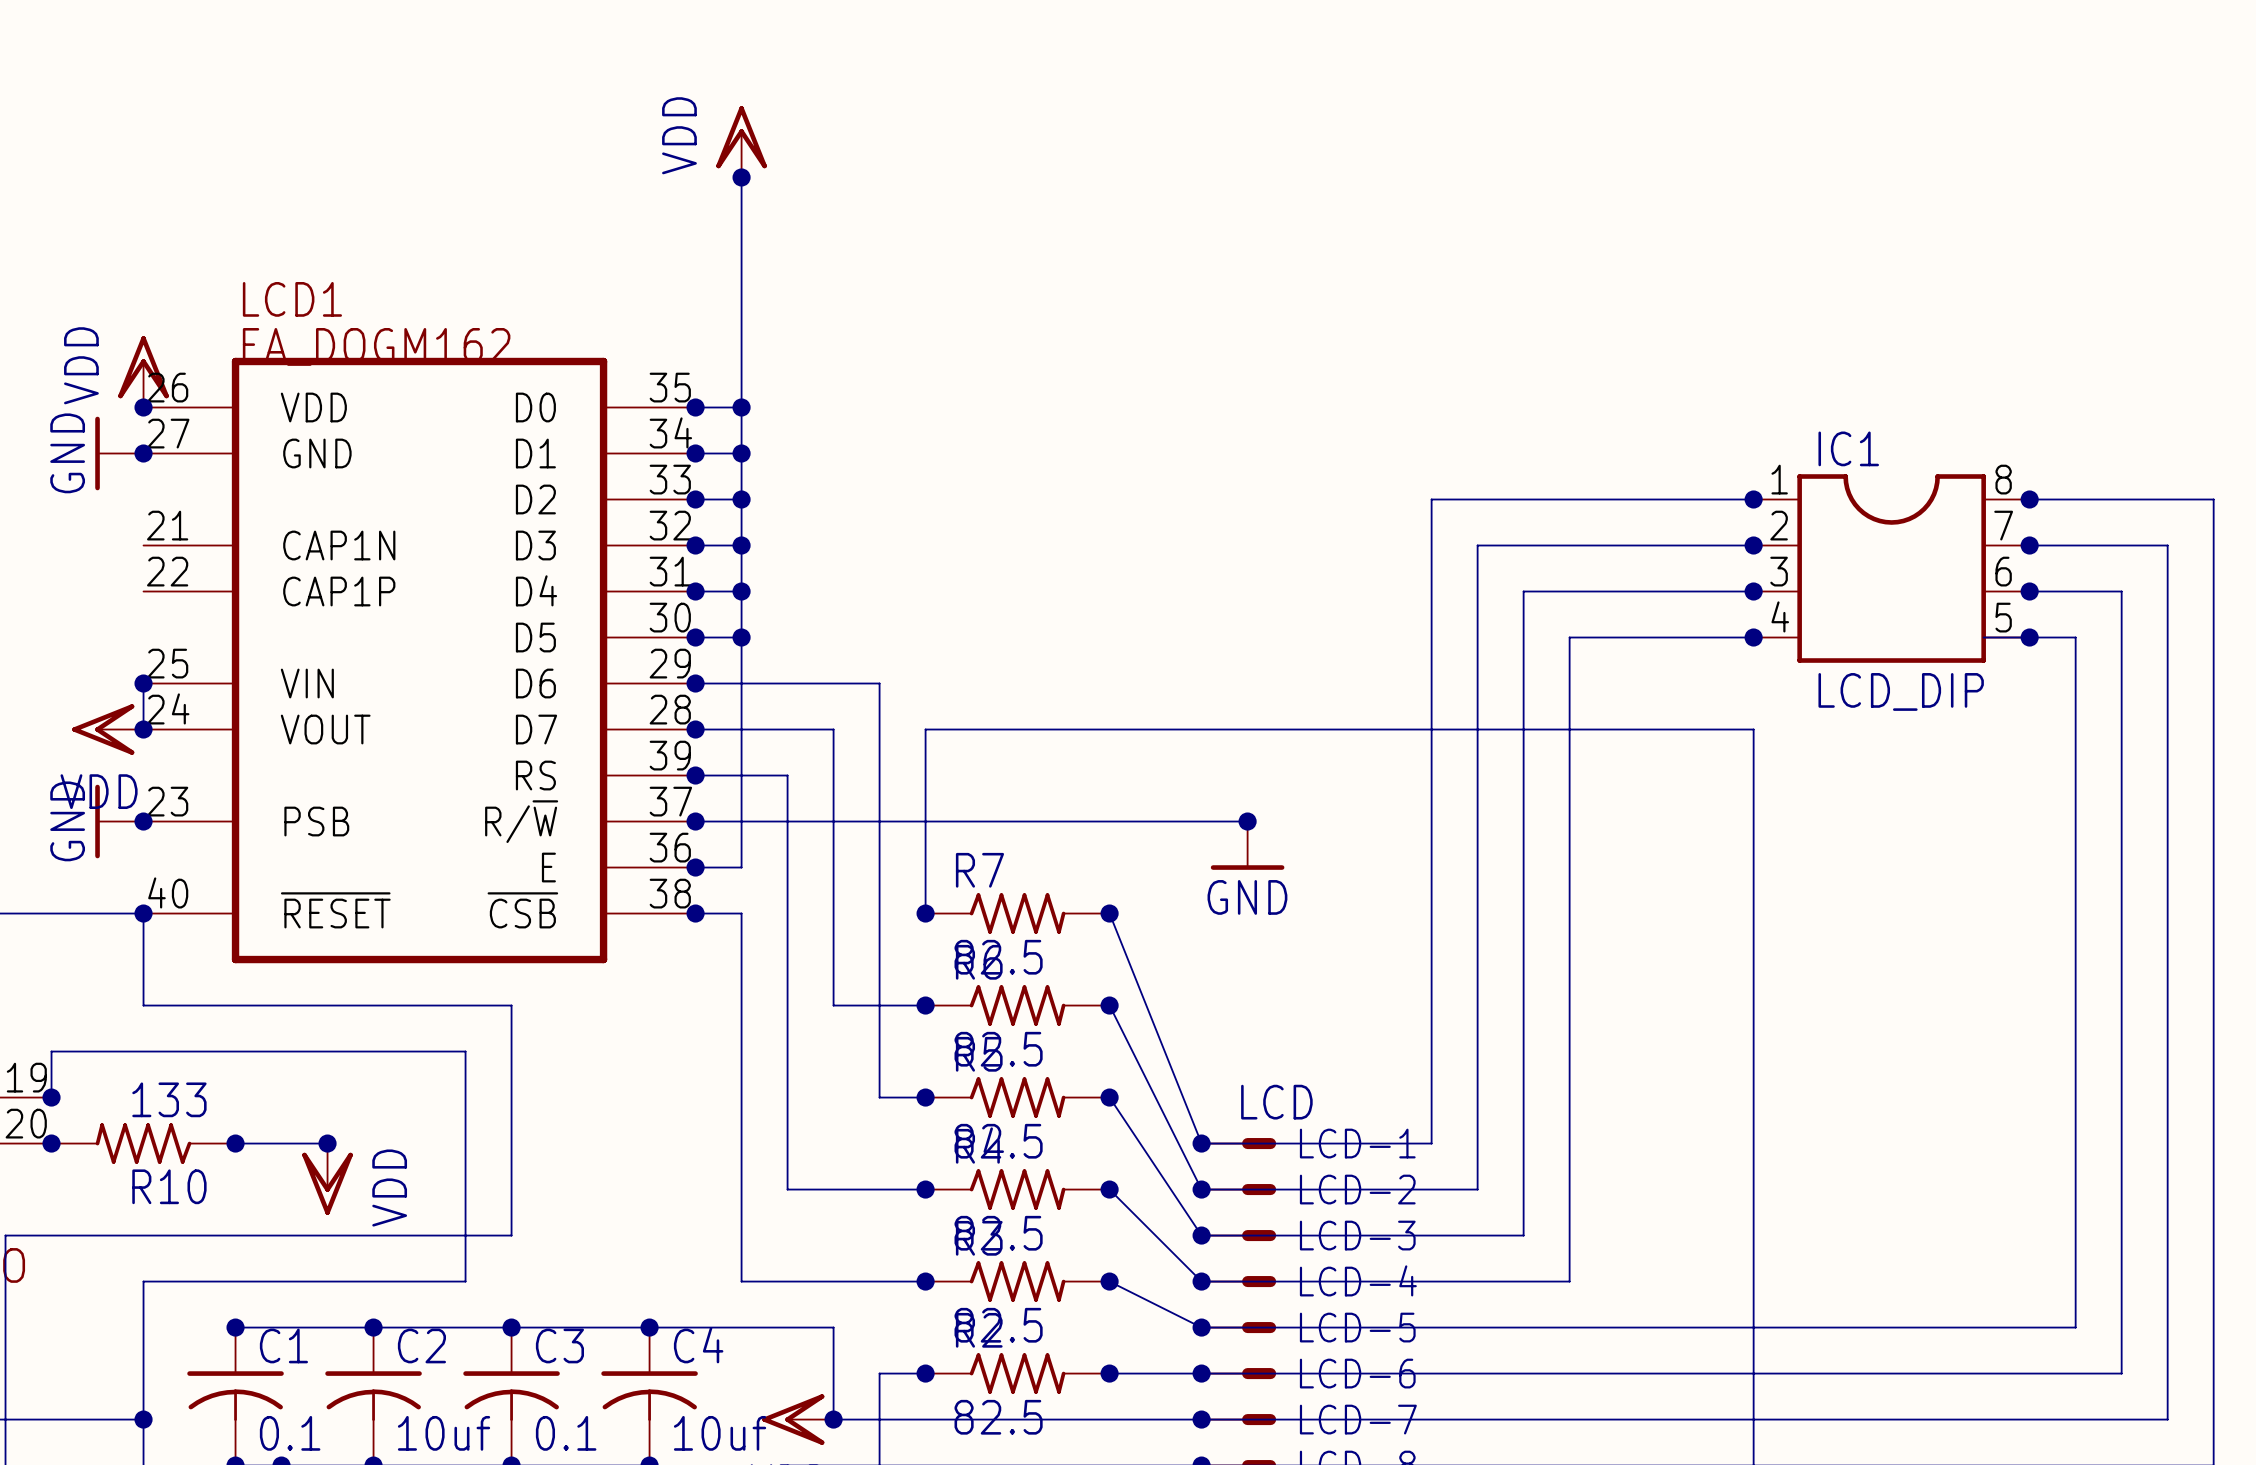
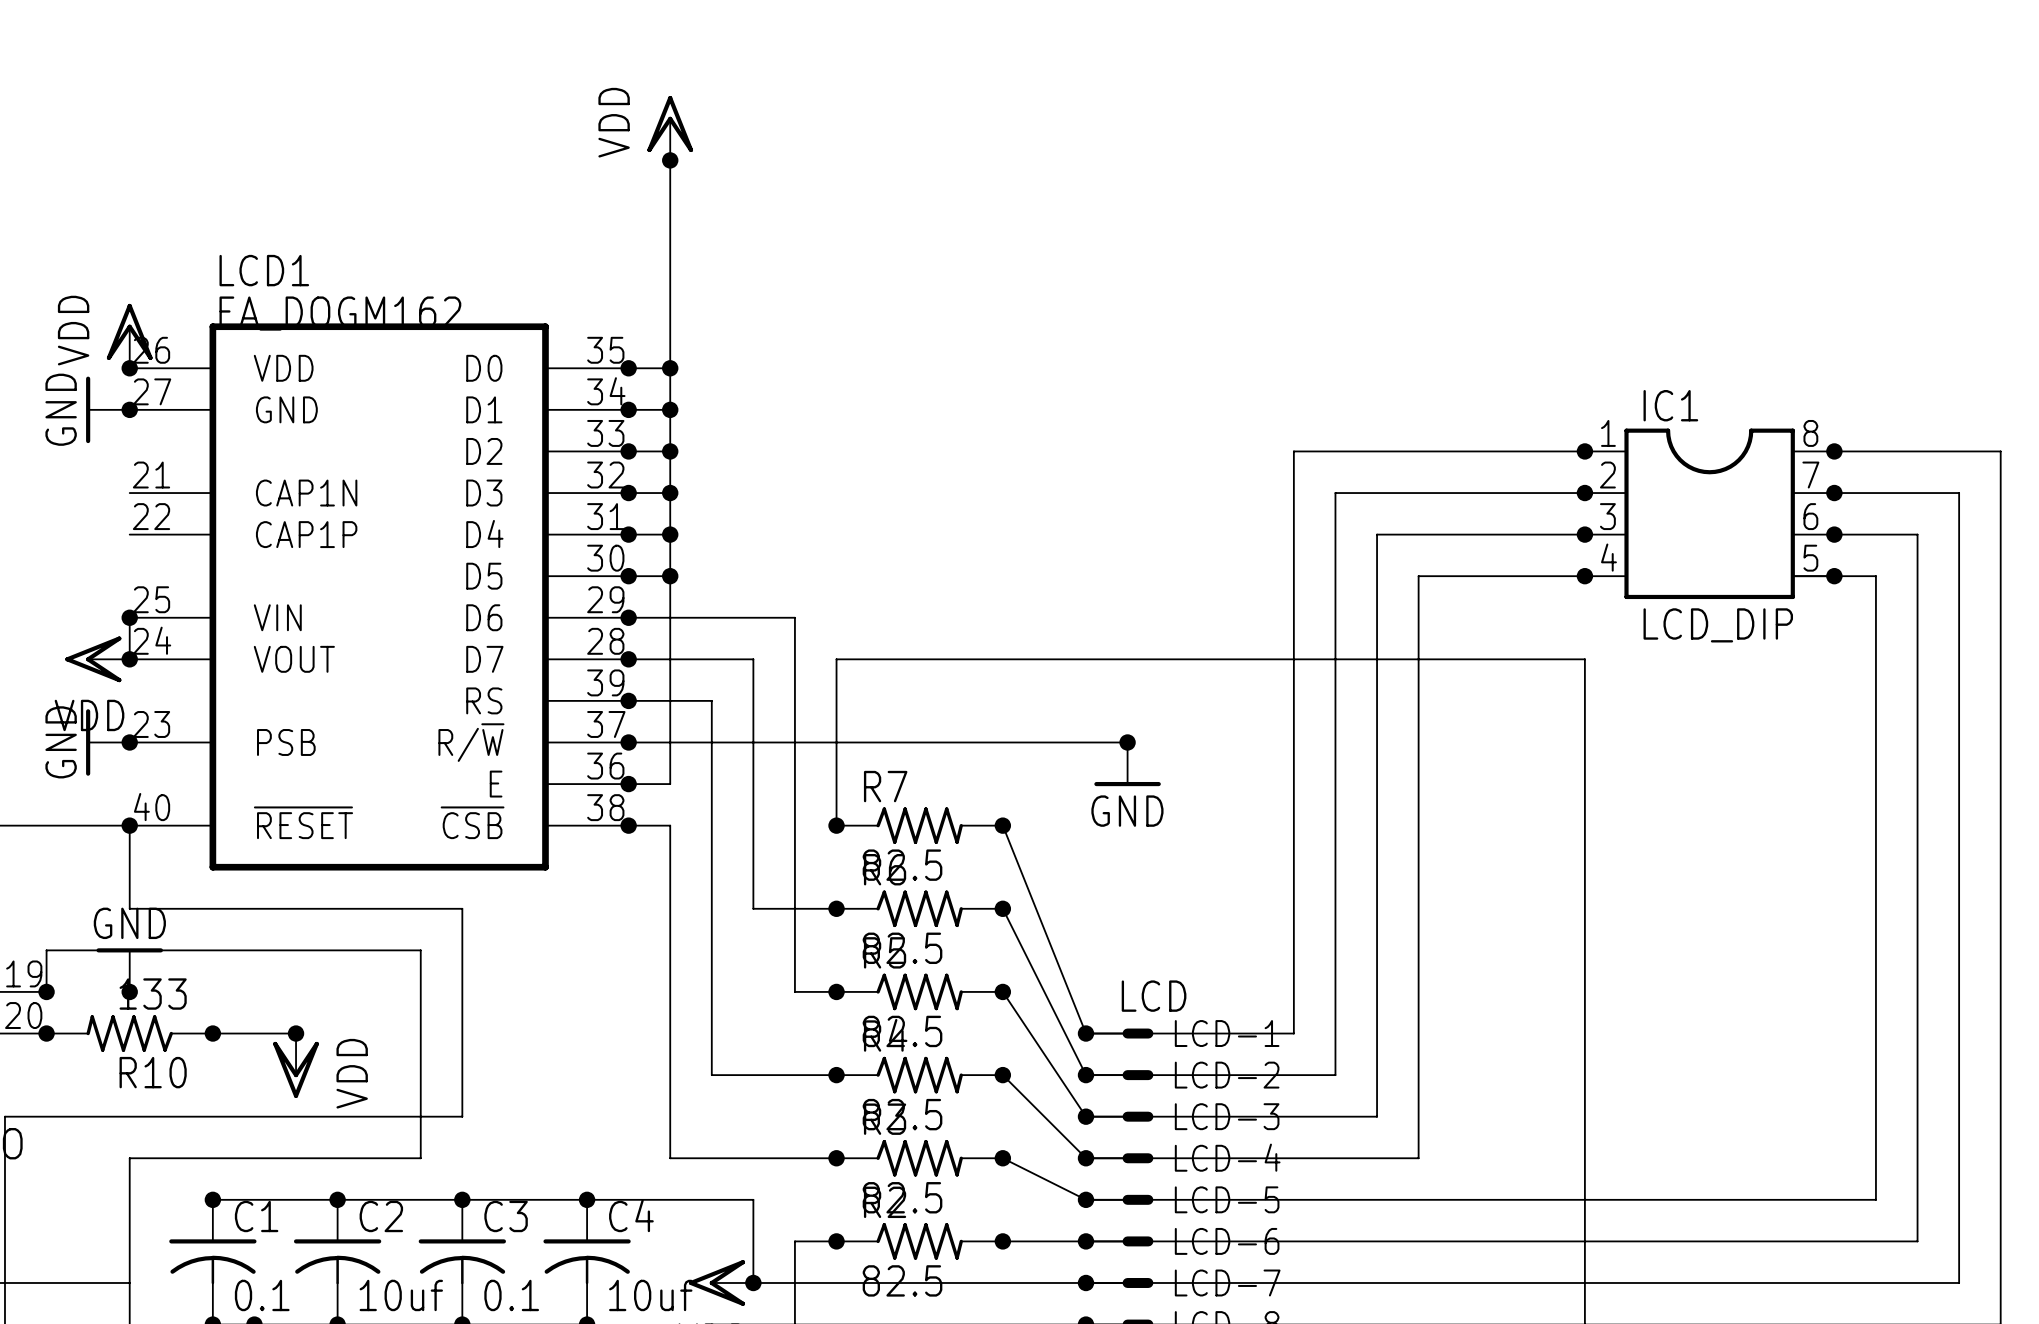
power symbol: none -> GND (129, 970)
junction: none -> (129, 991)
junction: (143, 1419) -> none

